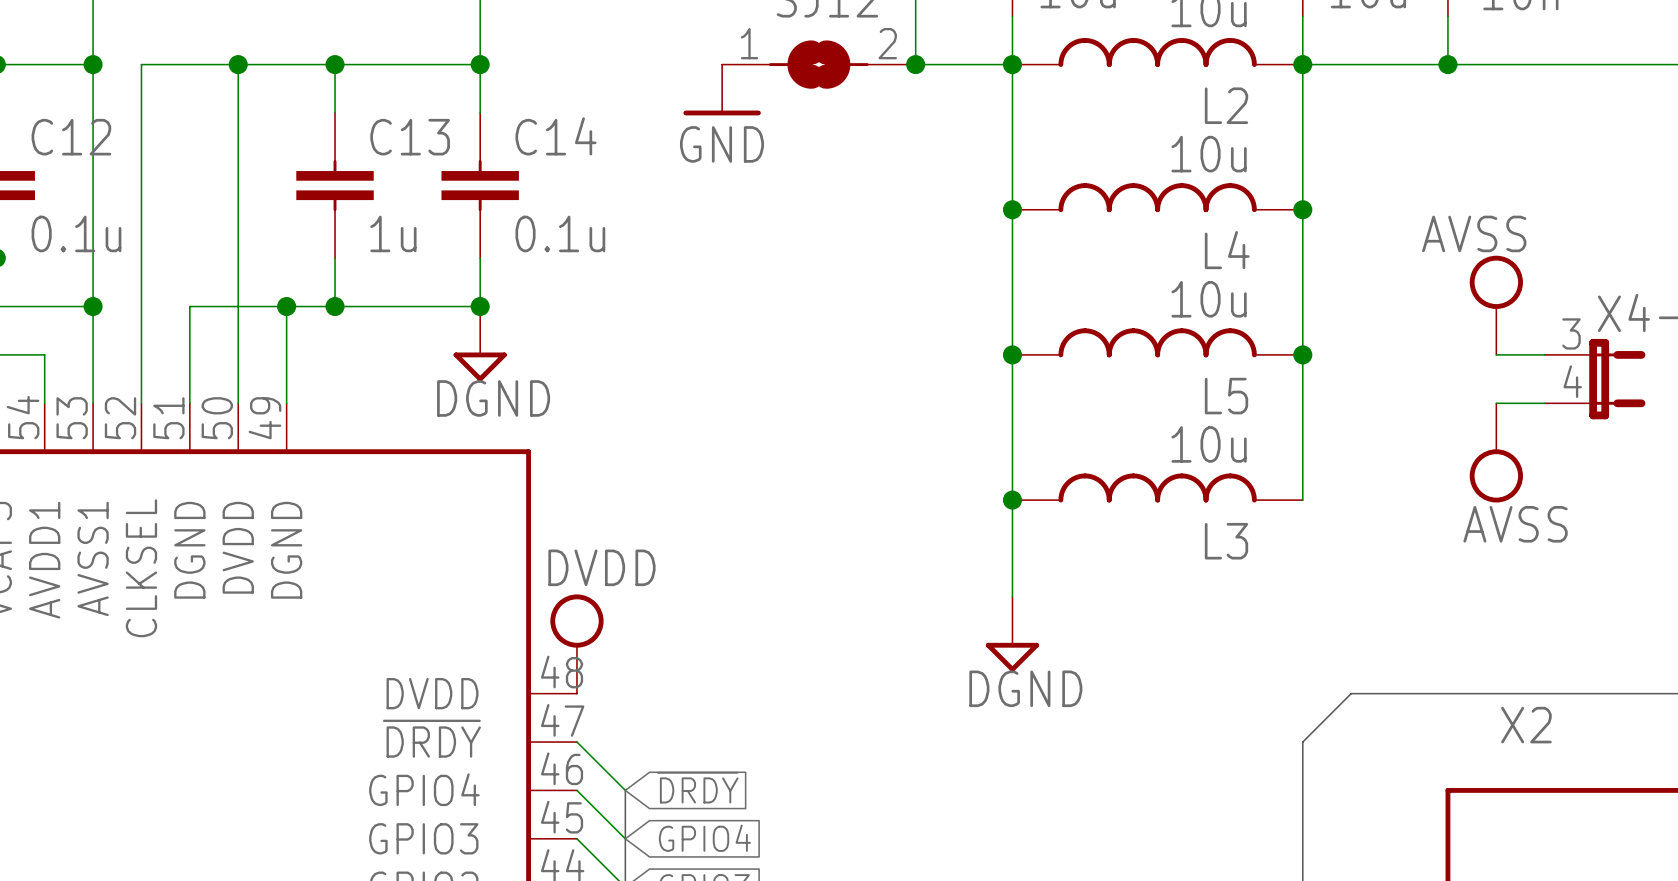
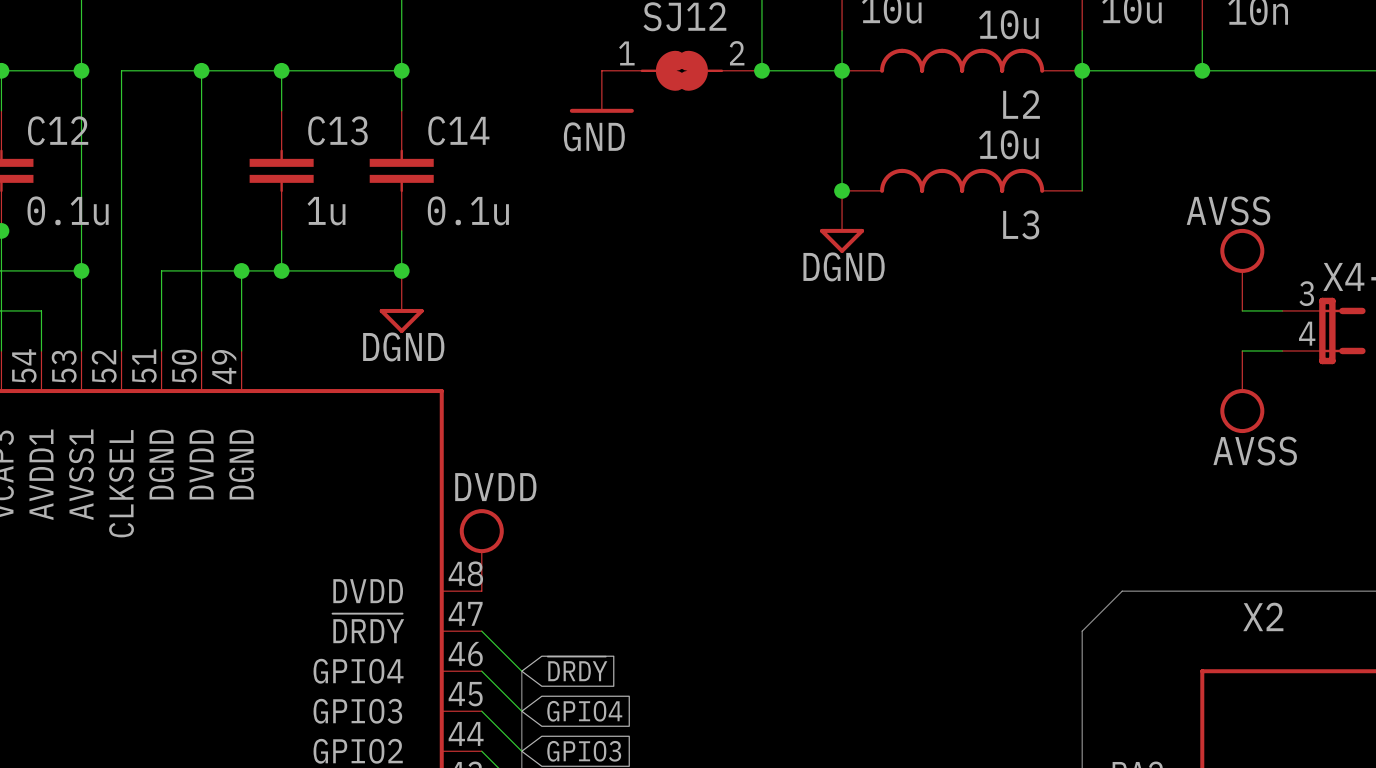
wire: (1012, 209) (1012, 596) -> none
wire: (1302, 209) (1302, 500) -> none
junction: (1302, 209) -> none
L4 name: L4 (1227, 250) -> L3 (1021, 224)
L5: 10u (1157, 342) -> none
junction: (1012, 354) -> none
junction: (1302, 354) -> none
L3: 10u (1157, 487) -> none
junction: (1012, 500) -> none
power symbol position: DGND (1012, 634) -> DGND (842, 221)

